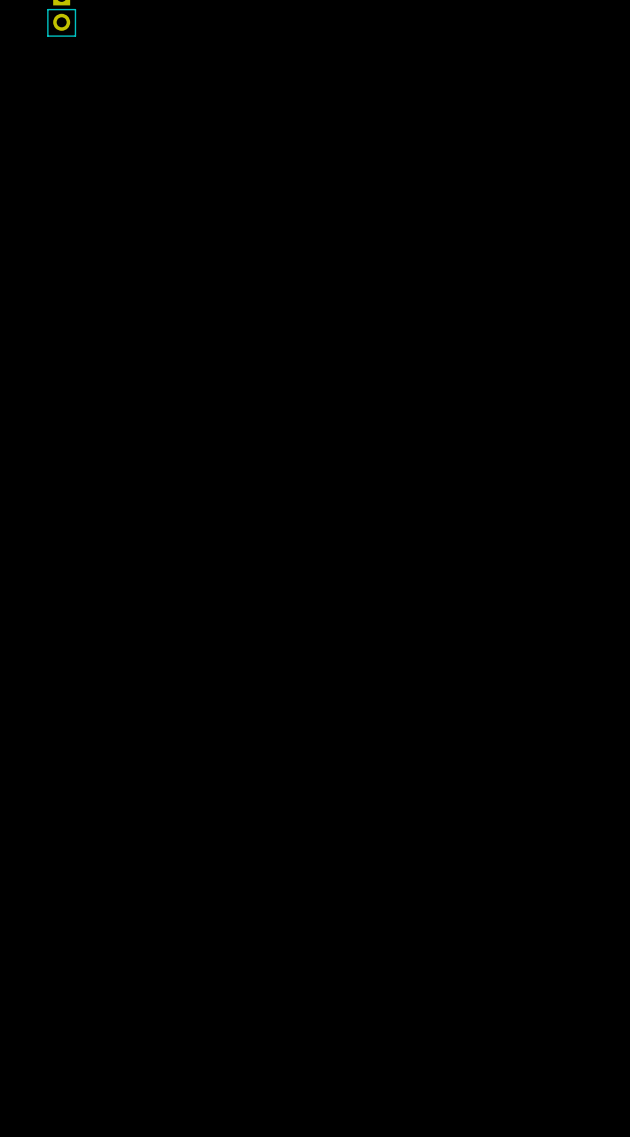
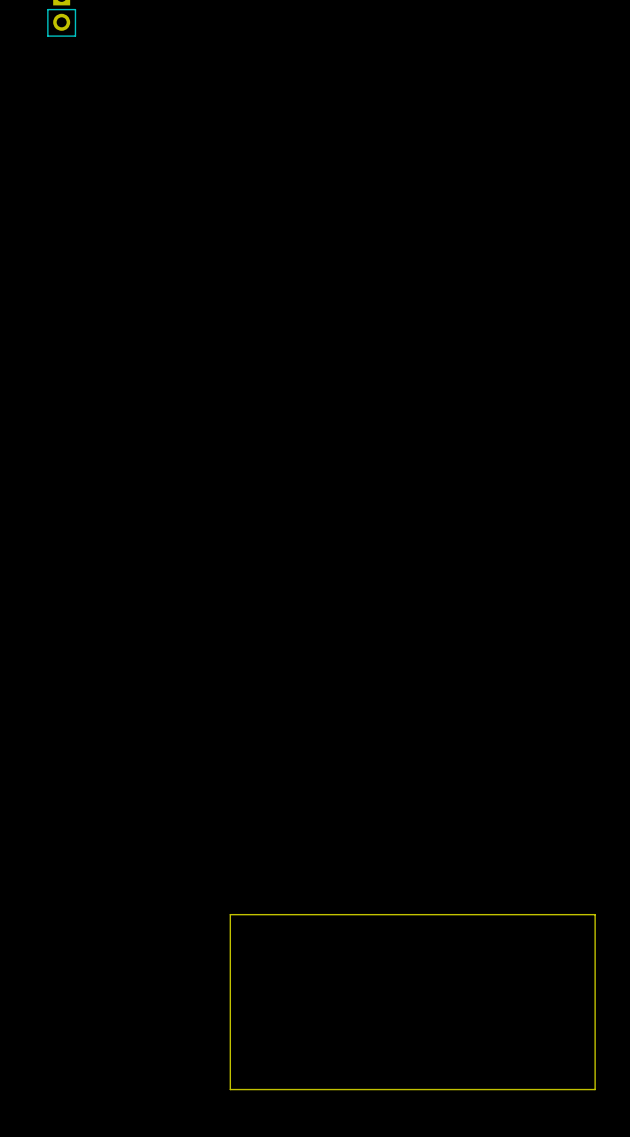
board edge: none -> (230, 914) (595, 914) (595, 1089) (230, 1089) (230, 914)

